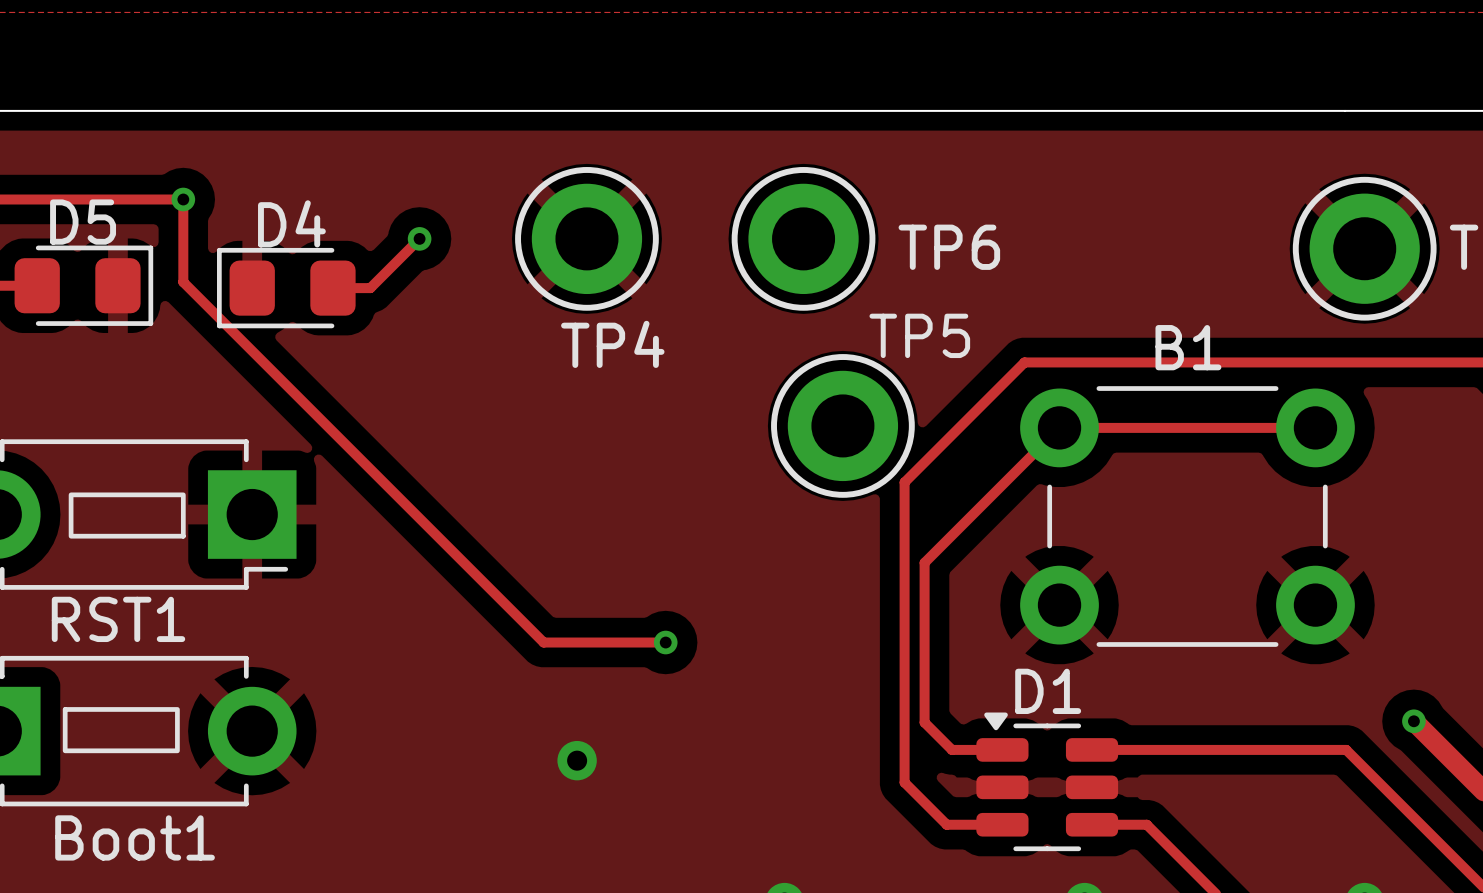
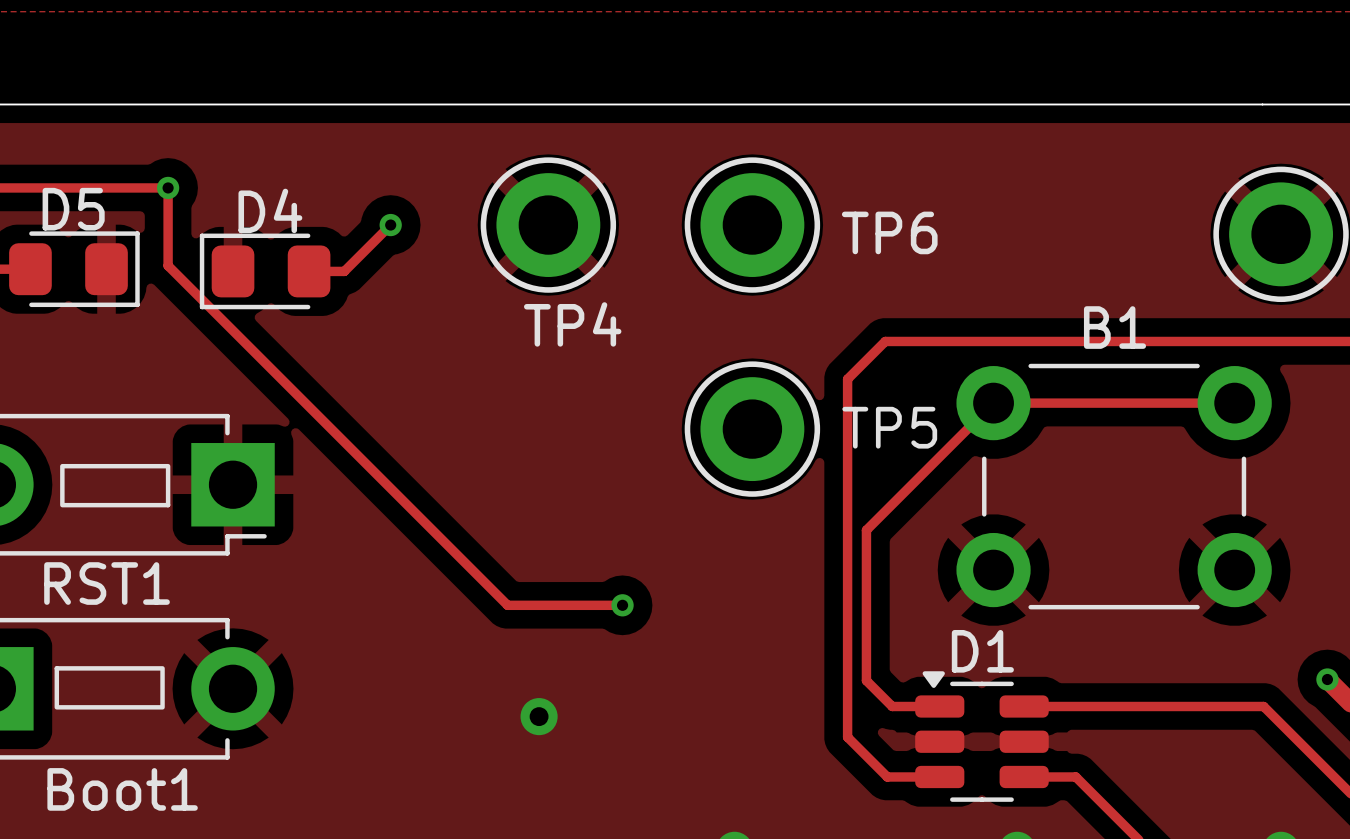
TP5 name position: TP5 (919, 335) -> TP5 (889, 427)
track: (1024, 362) (904, 482) -> (960, 341) (885, 341) (847, 379) (847, 454)
TP5 position: (842, 425) -> (752, 429)

